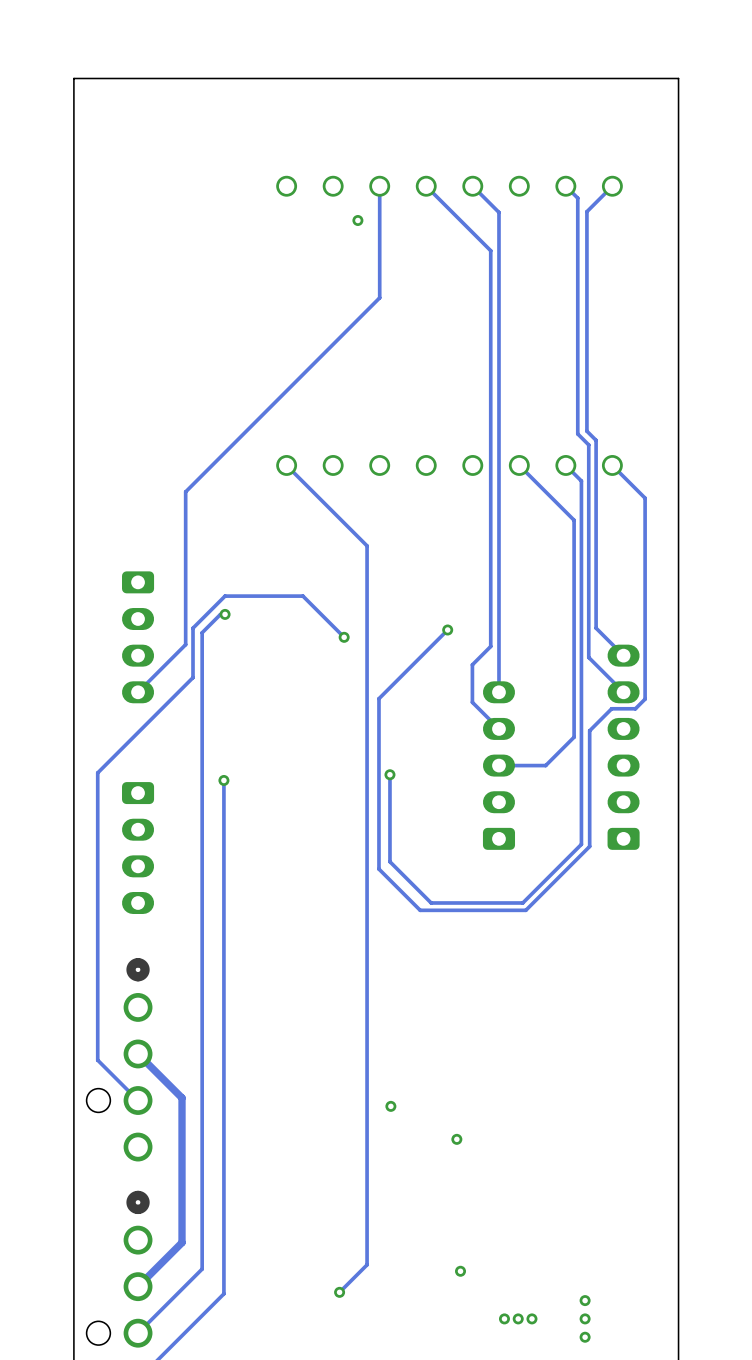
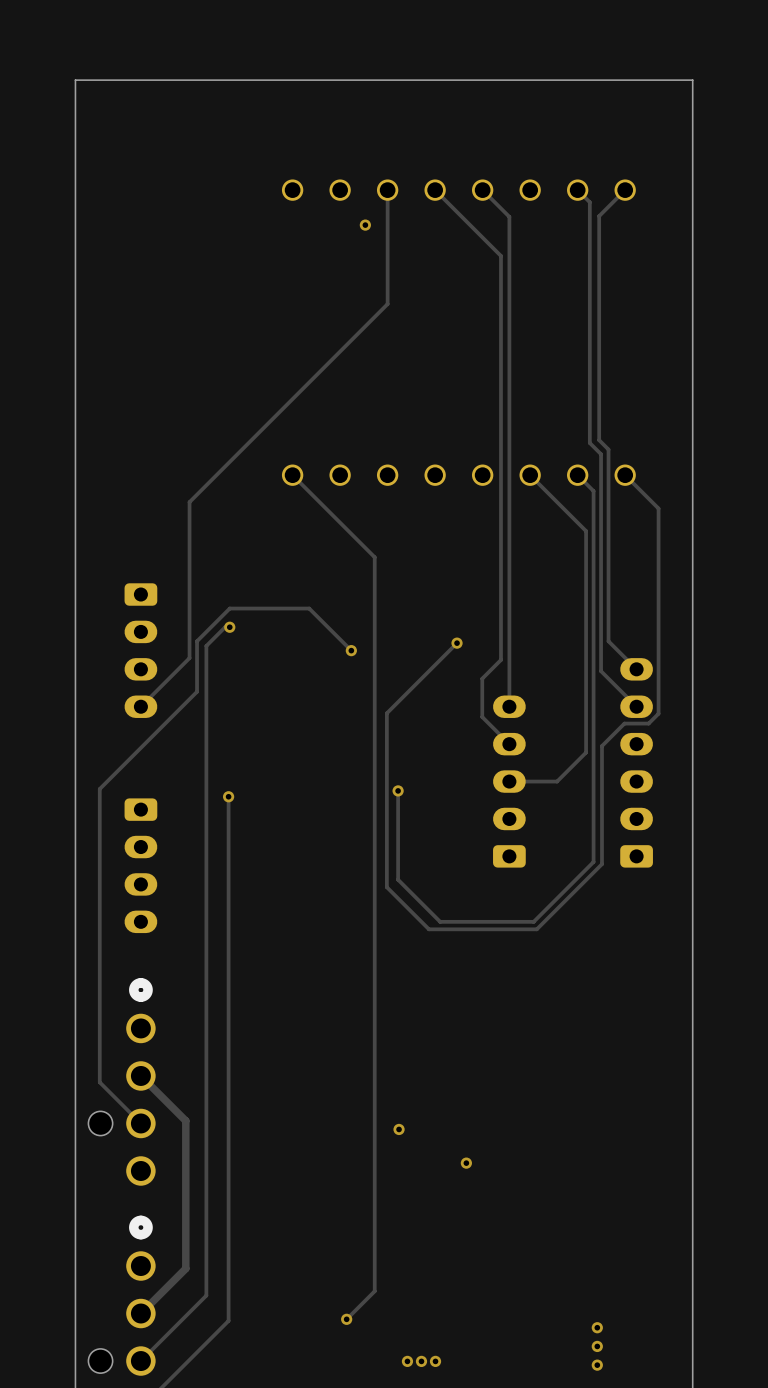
via: (460, 1271) -> none
via: (504, 1318) -> none
via: (518, 1318) -> none
via: (531, 1318) -> none
via: none -> (407, 1361)
via: none -> (421, 1361)
via: none -> (435, 1361)

